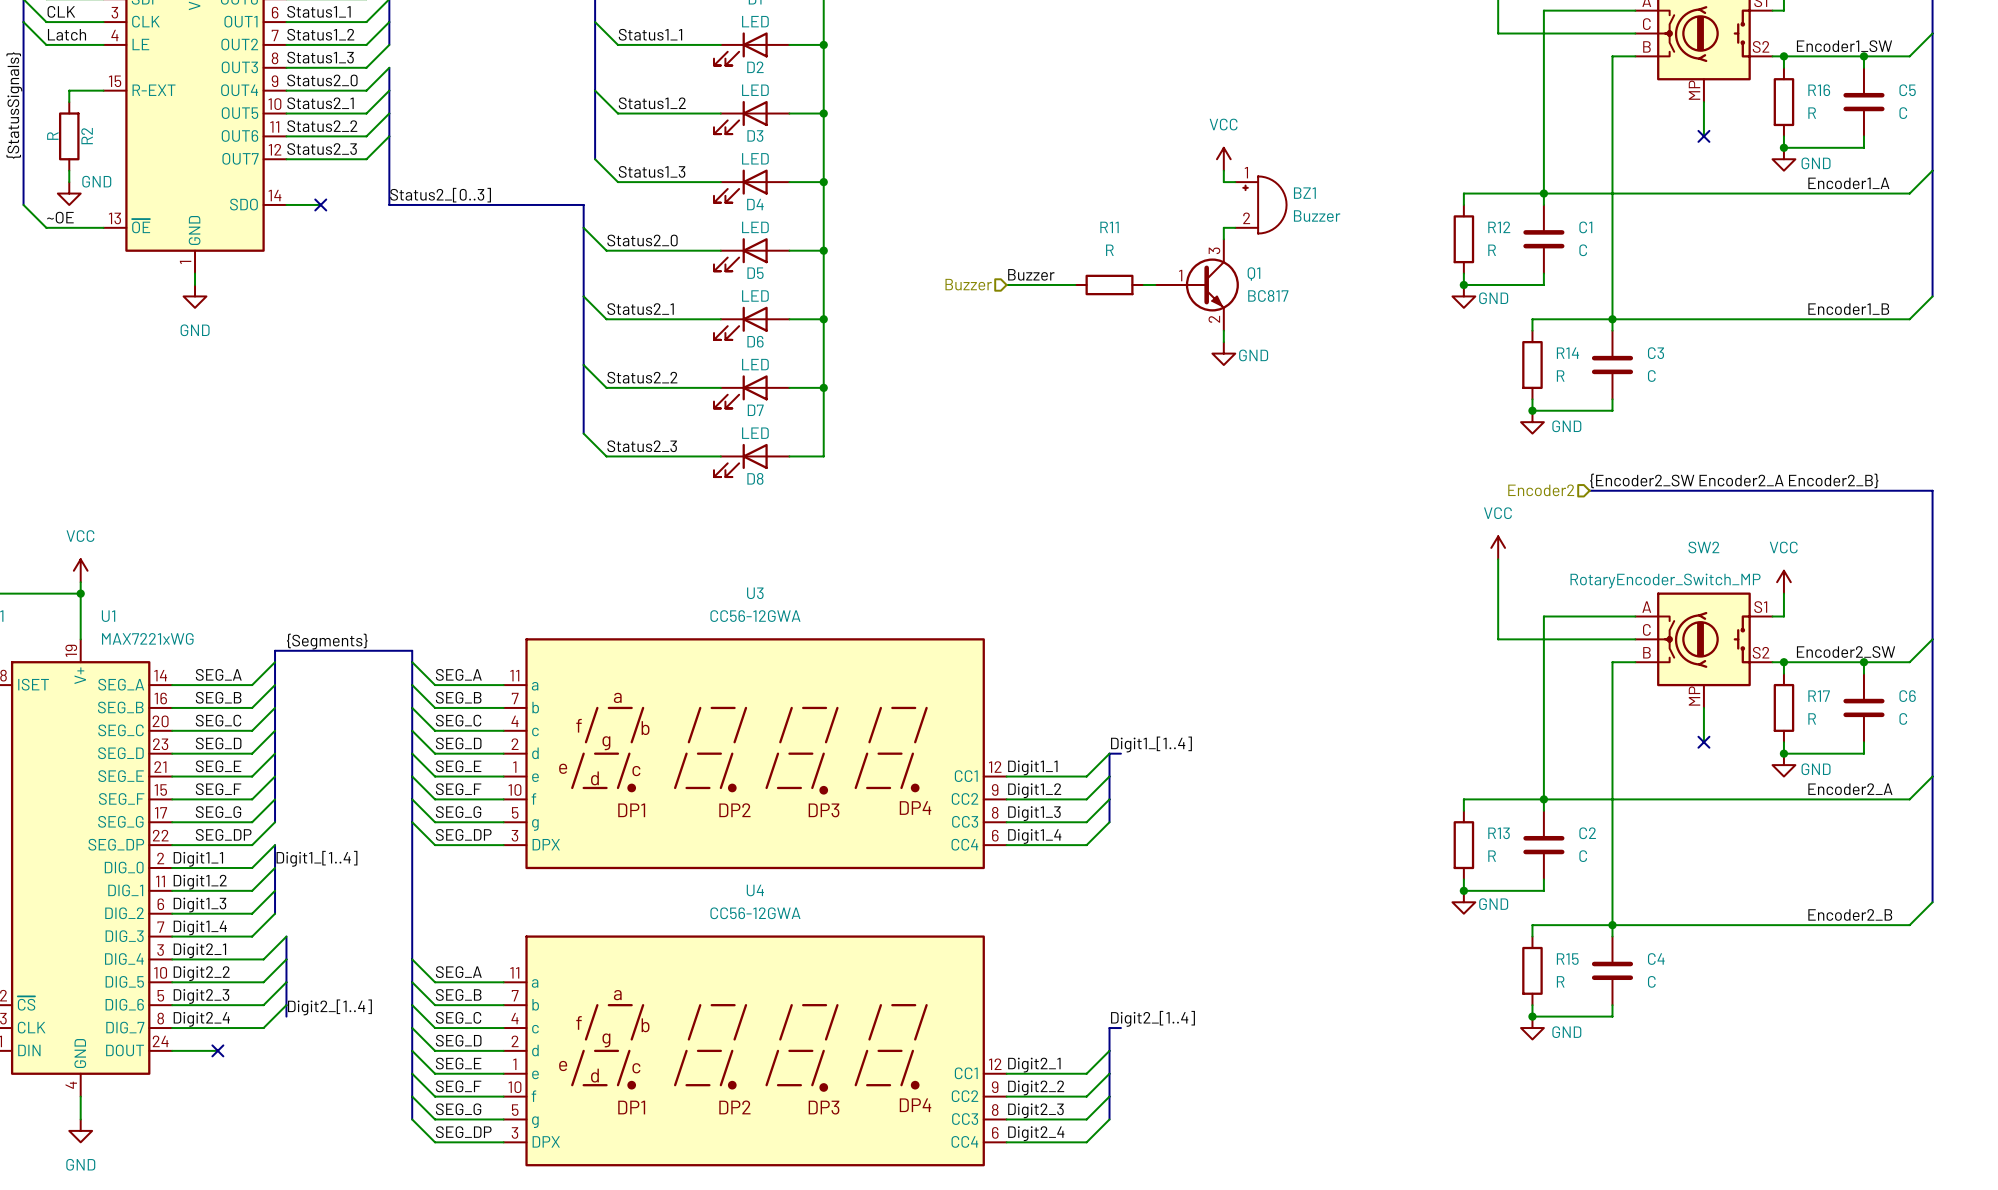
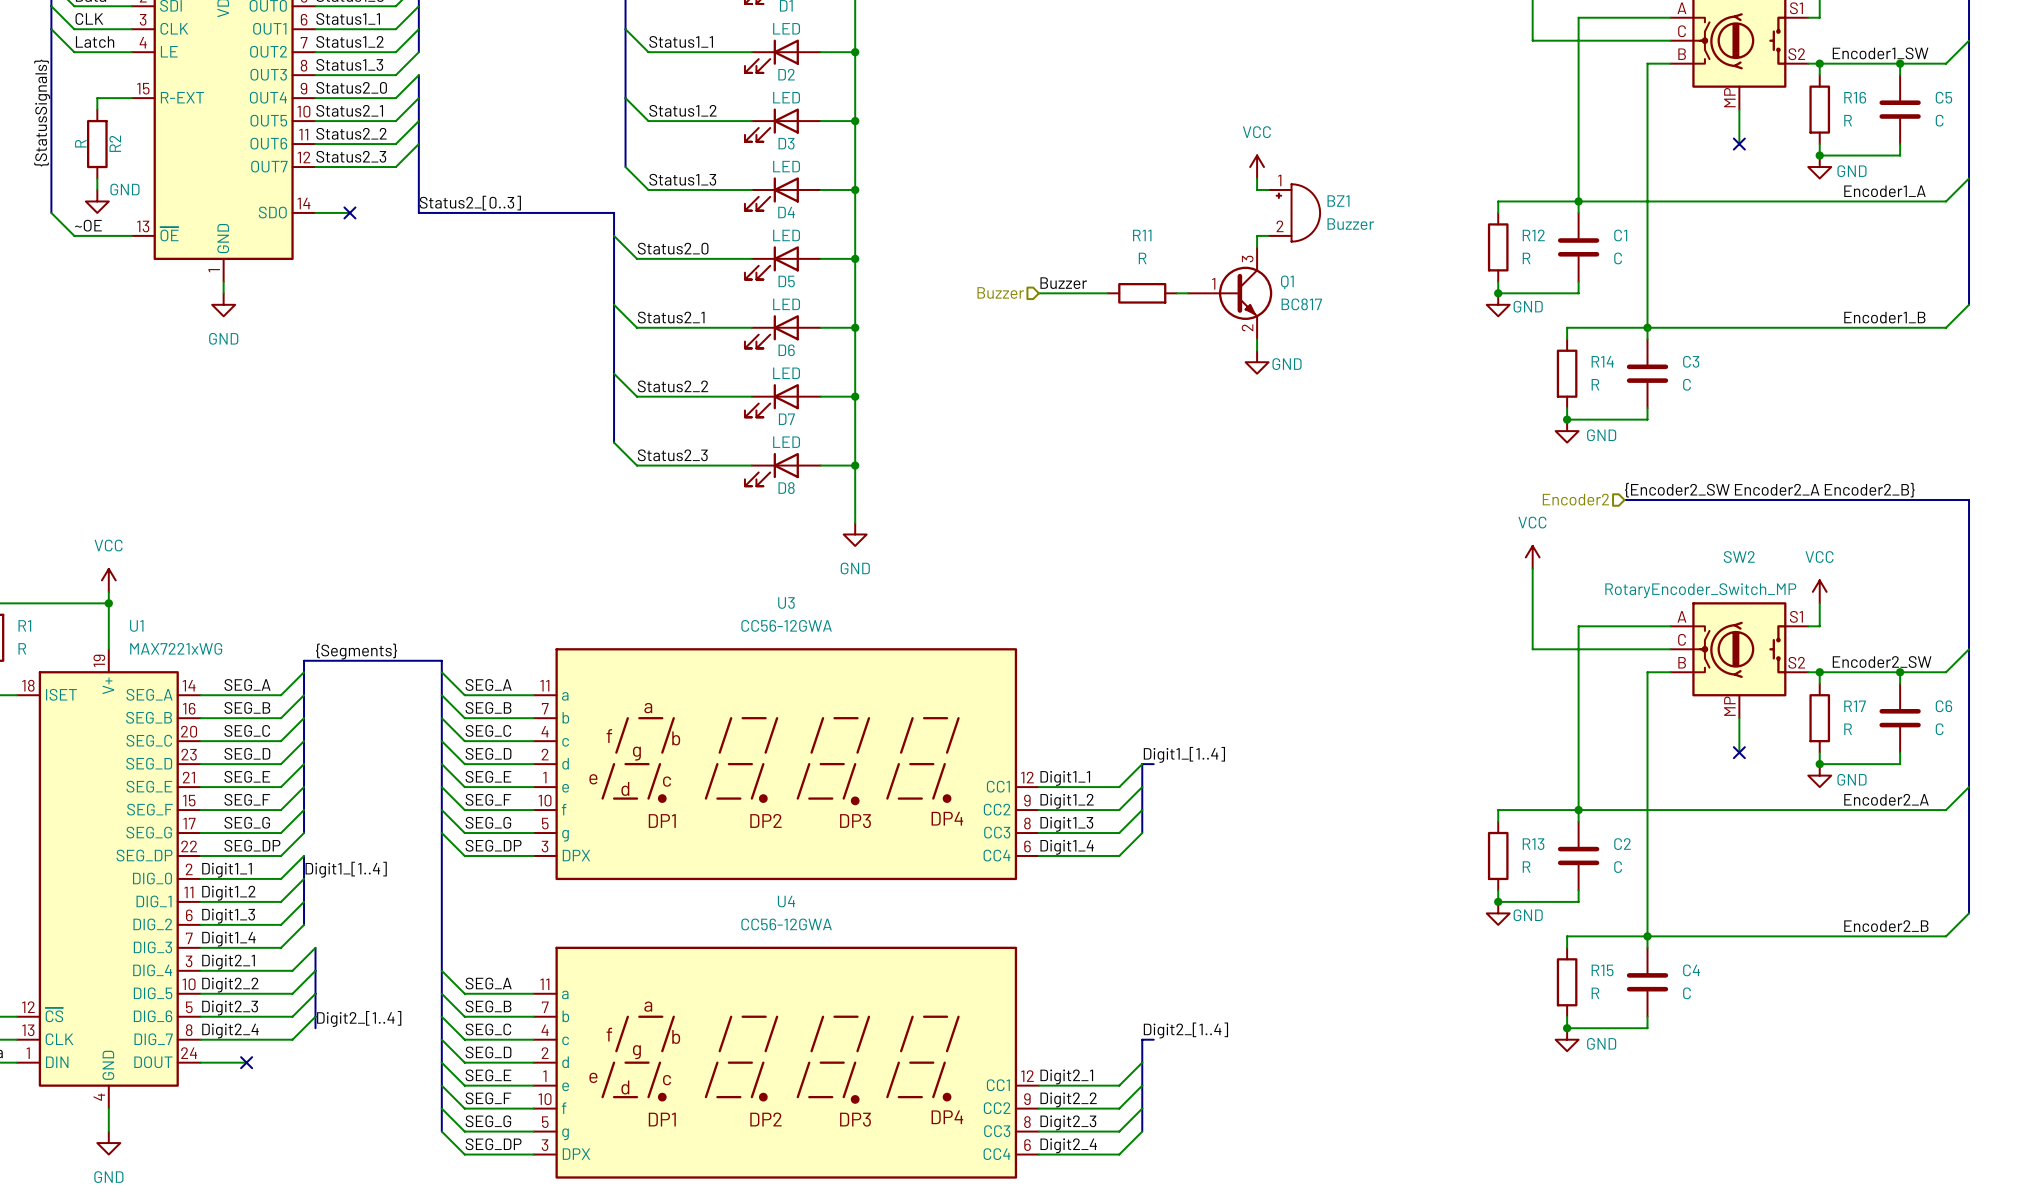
wire: none -> (855, 465) (855, 522)
junction: none -> (855, 465)
power symbol: none -> GND (855, 534)

